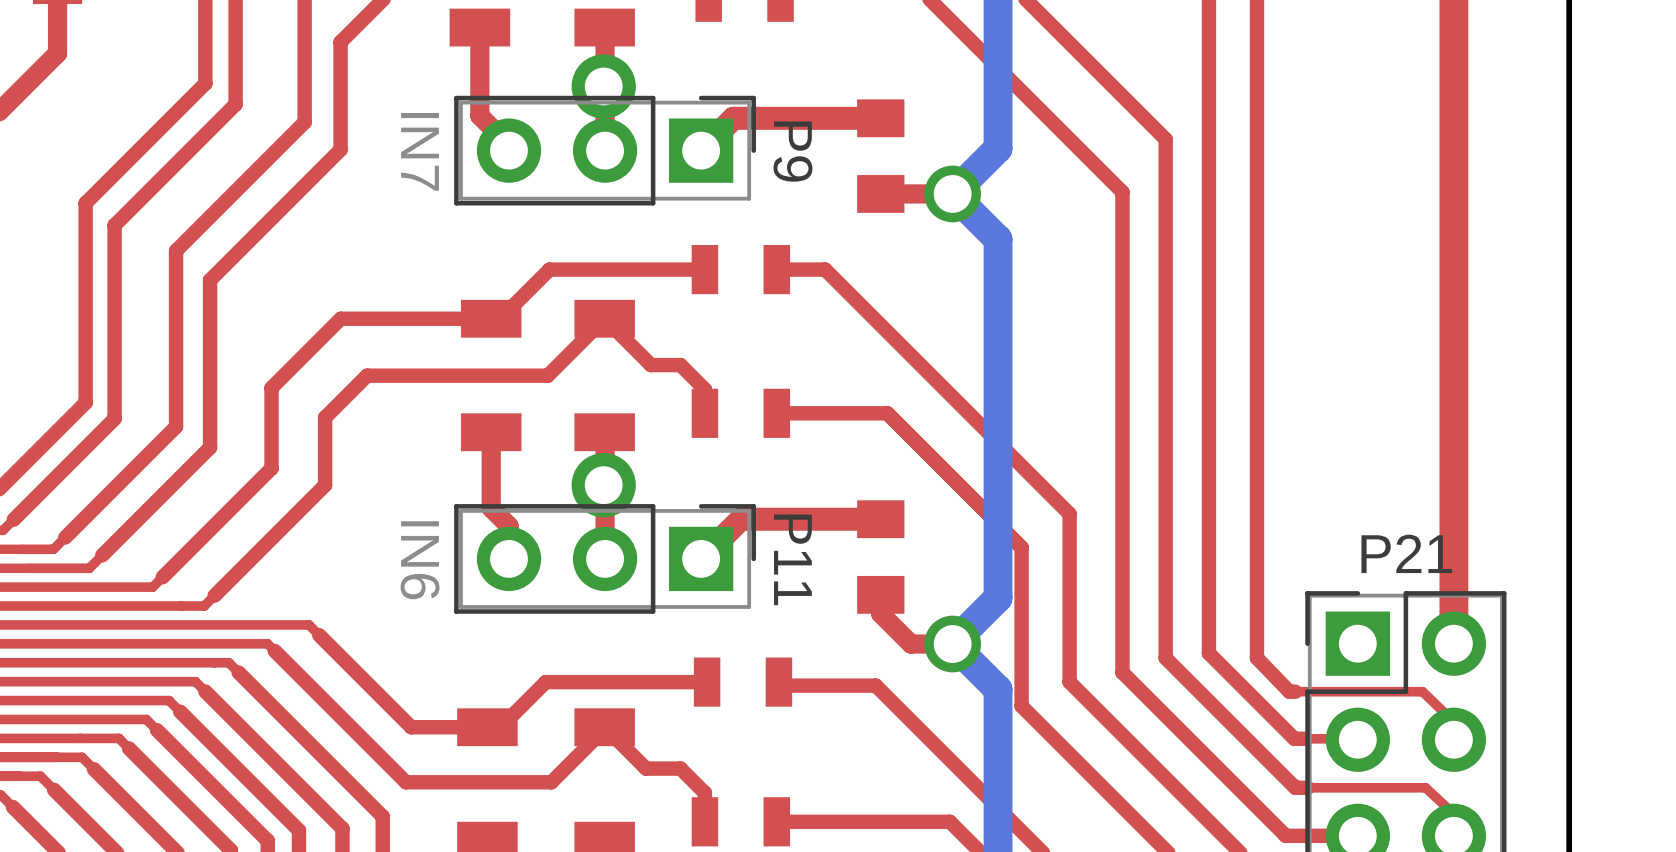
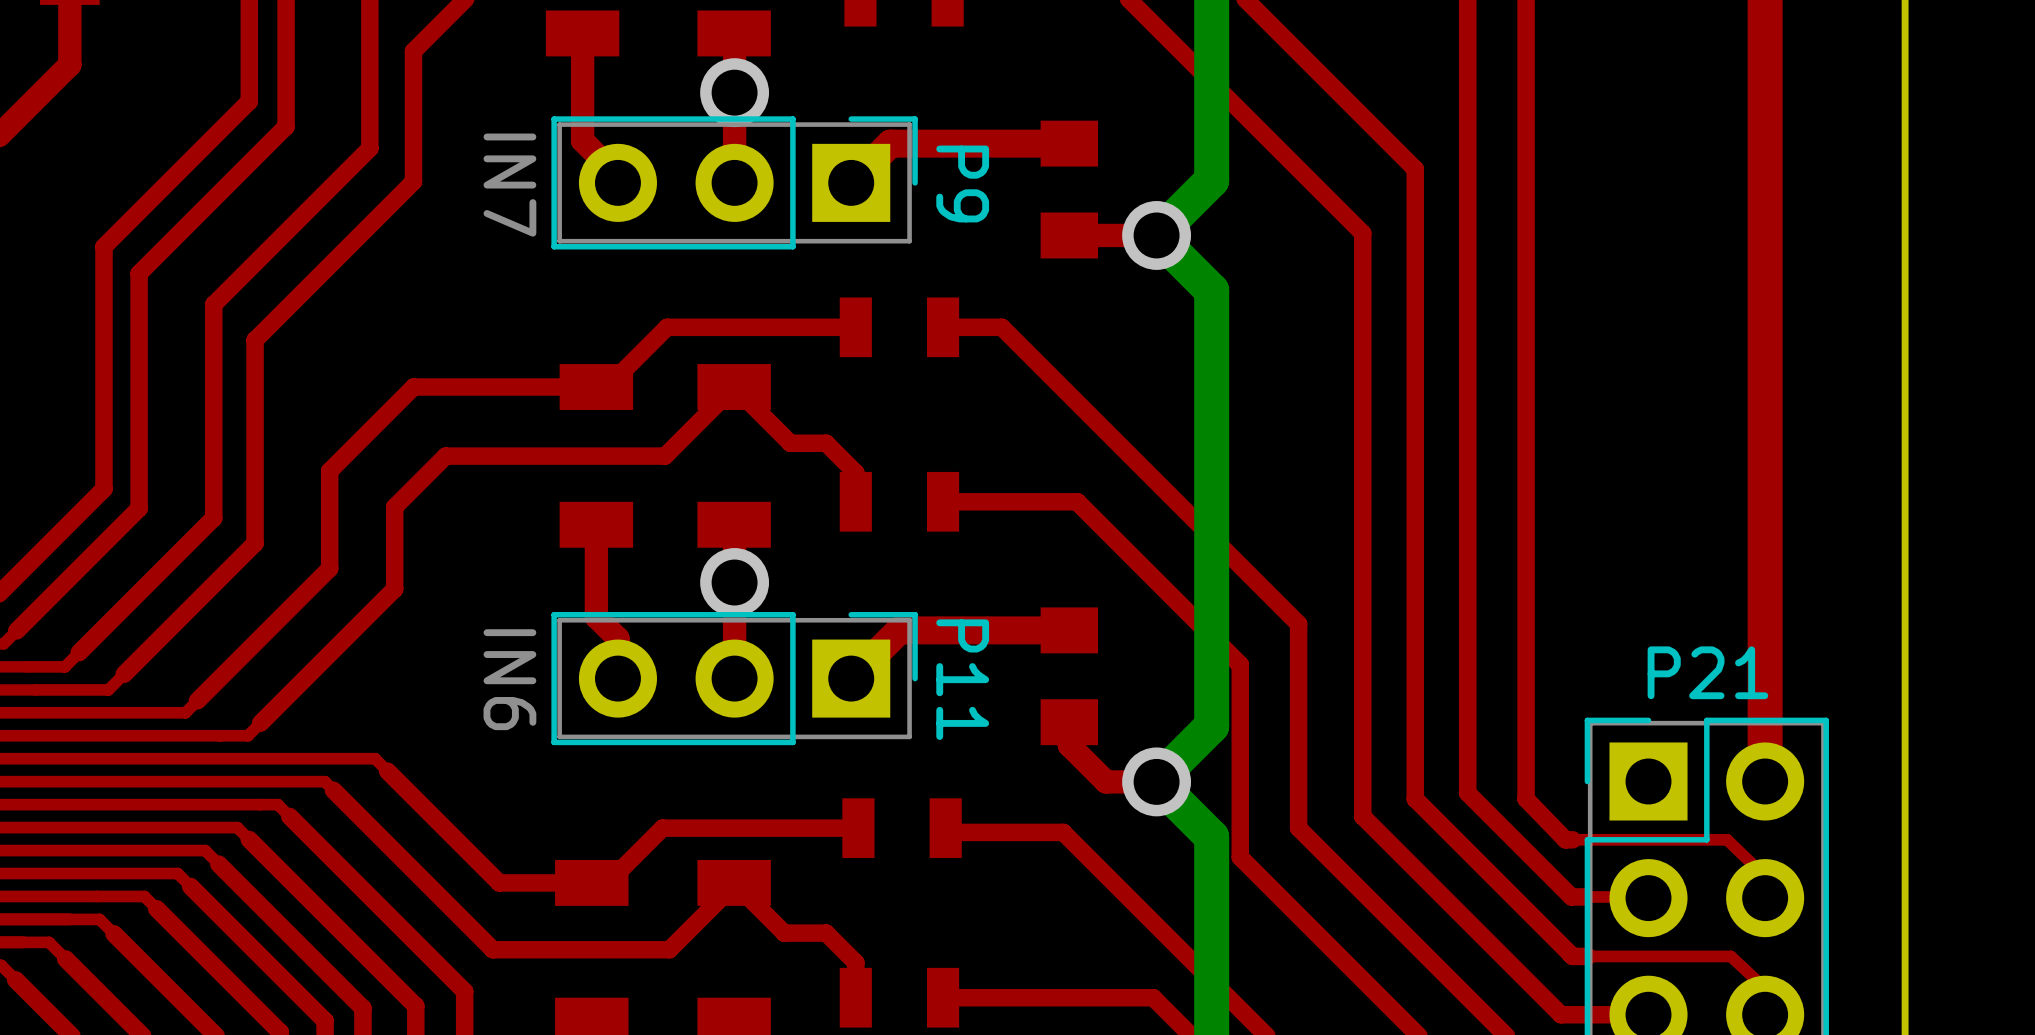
via: none -> (734, 92)
part: (603, 86) -> none
via: none -> (734, 582)
part: (603, 485) -> none

